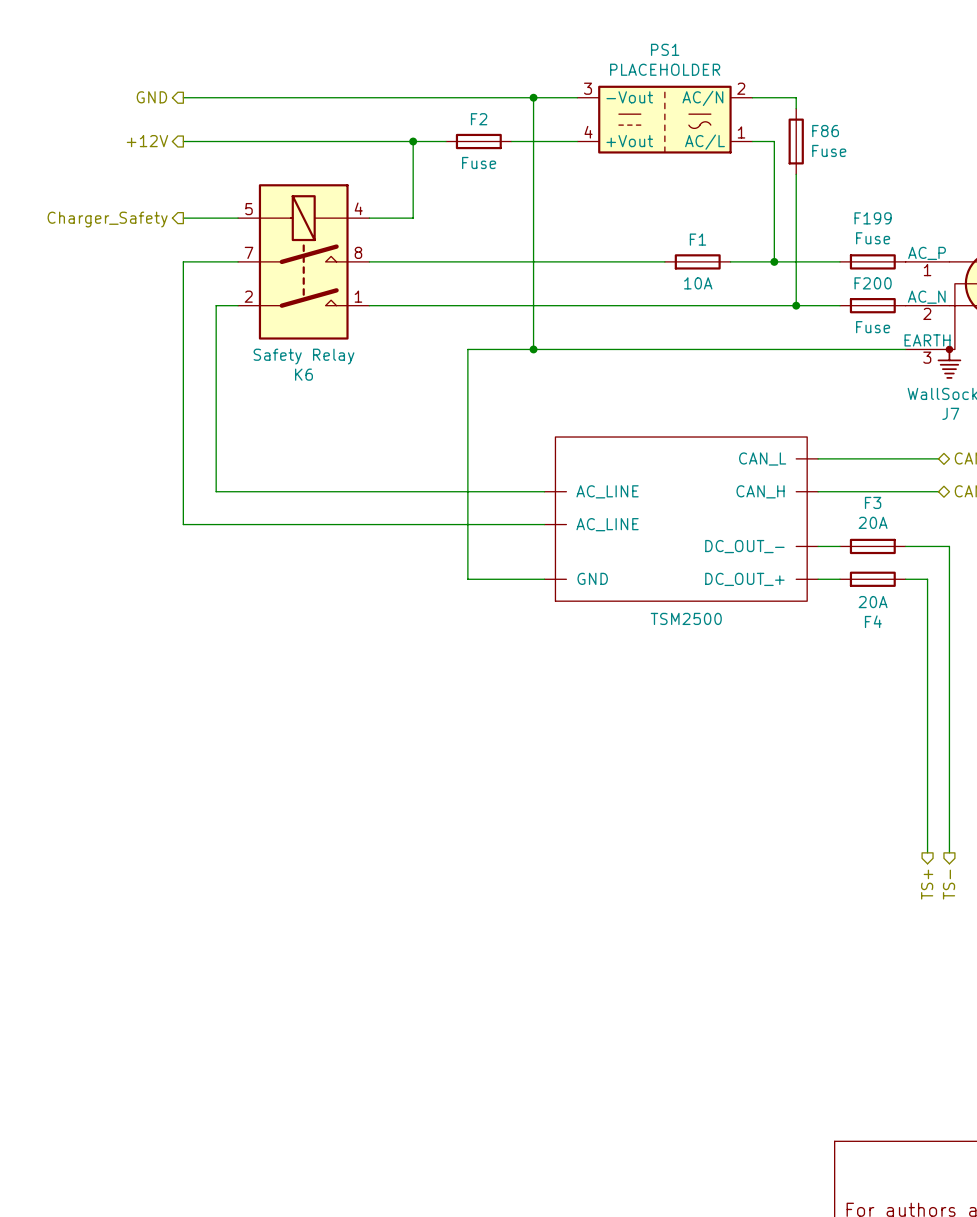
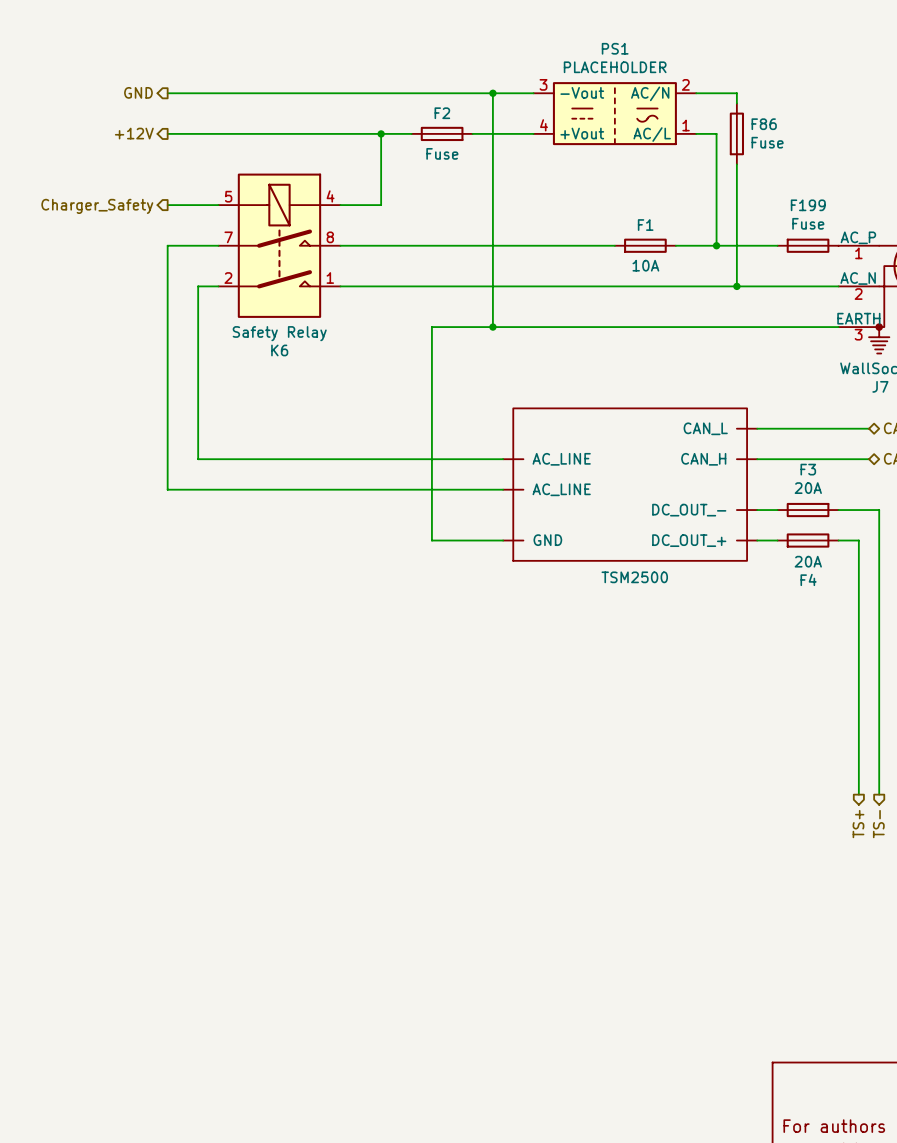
F200: Fuse (872, 305) -> none

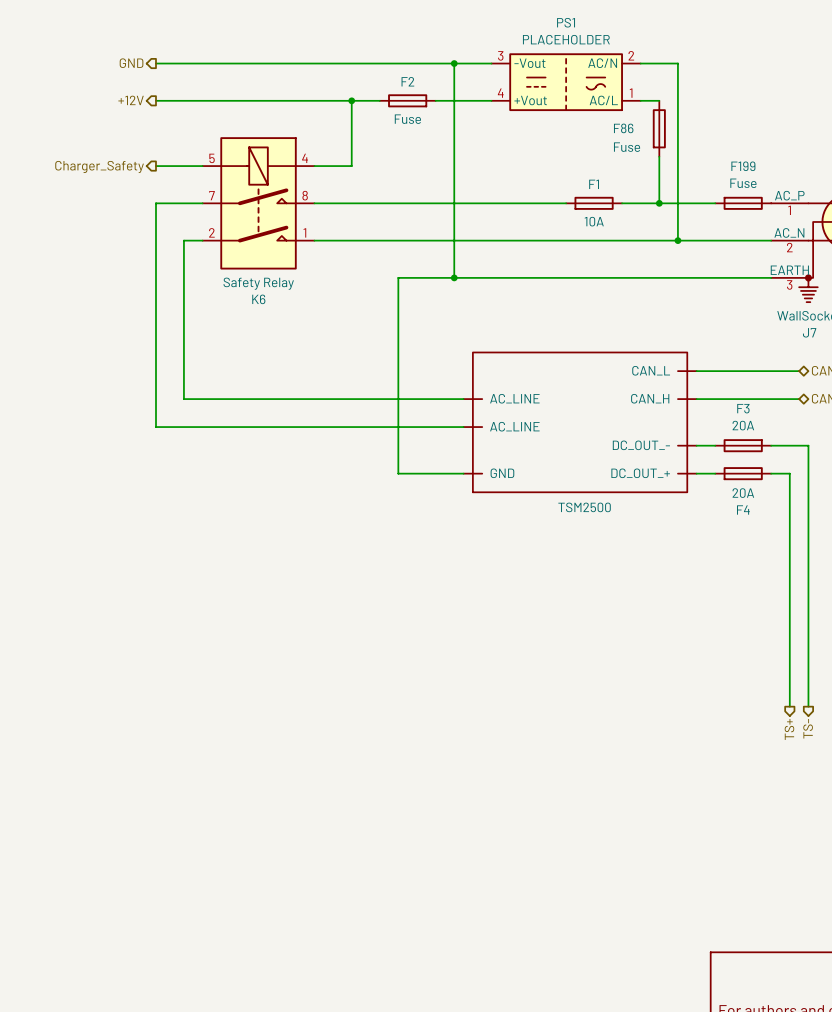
F86 name position: F86 (764, 124) -> F86 (623, 128)
F86 position: (736, 133) -> (659, 128)
F86 value position: Fuse (767, 142) -> Fuse (627, 147)

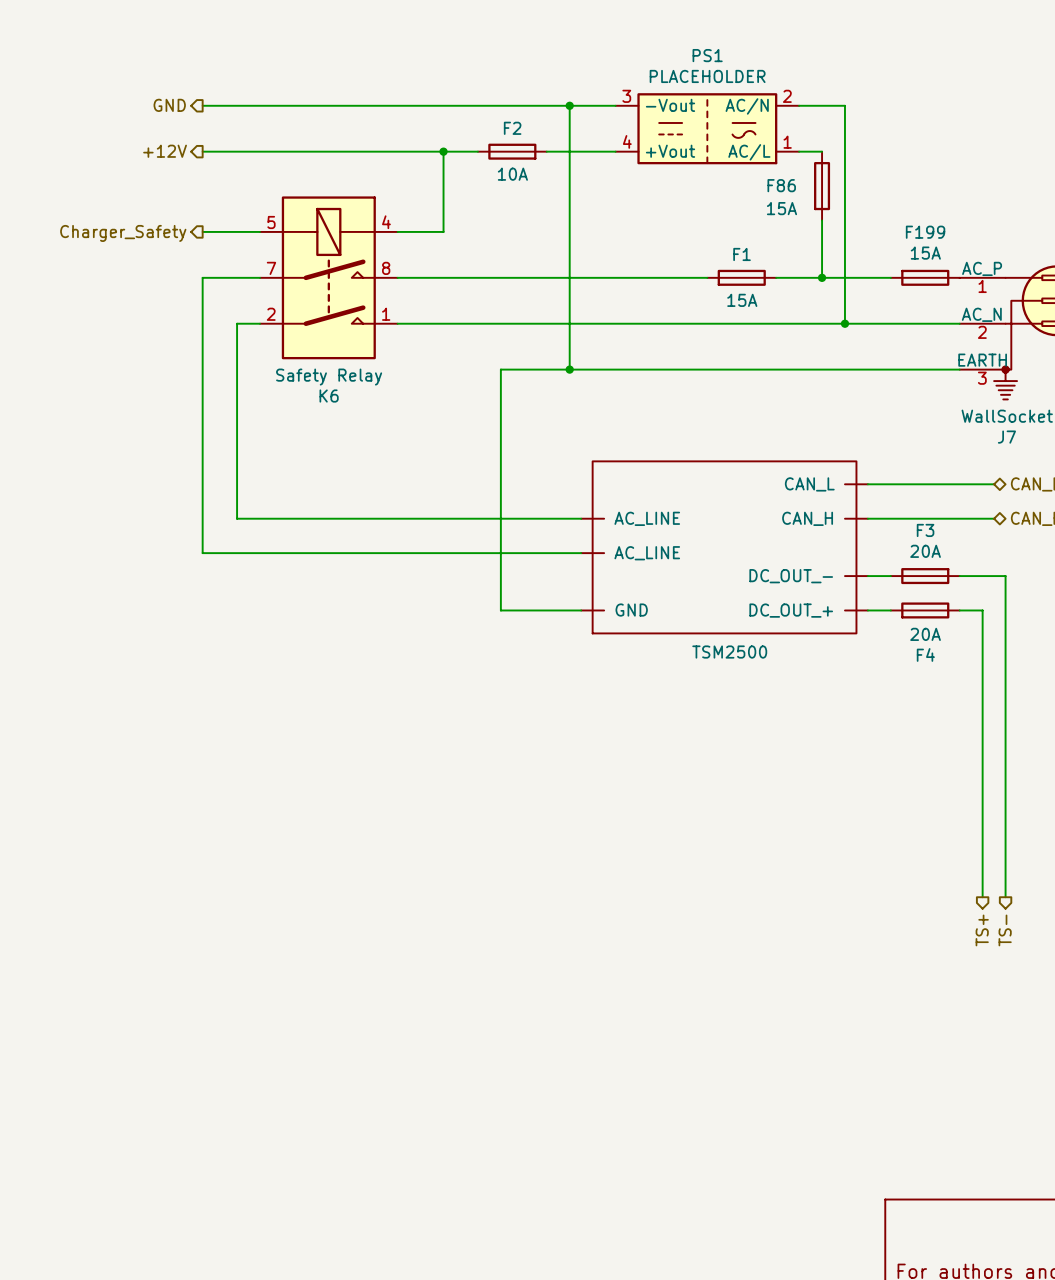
F2 value: Fuse (407, 119) -> 10A (512, 174)
F86 value: Fuse (627, 147) -> 15A (781, 208)
F199 value: Fuse (743, 183) -> 15A (925, 253)
F1 value: 10A (594, 221) -> 15A (742, 300)

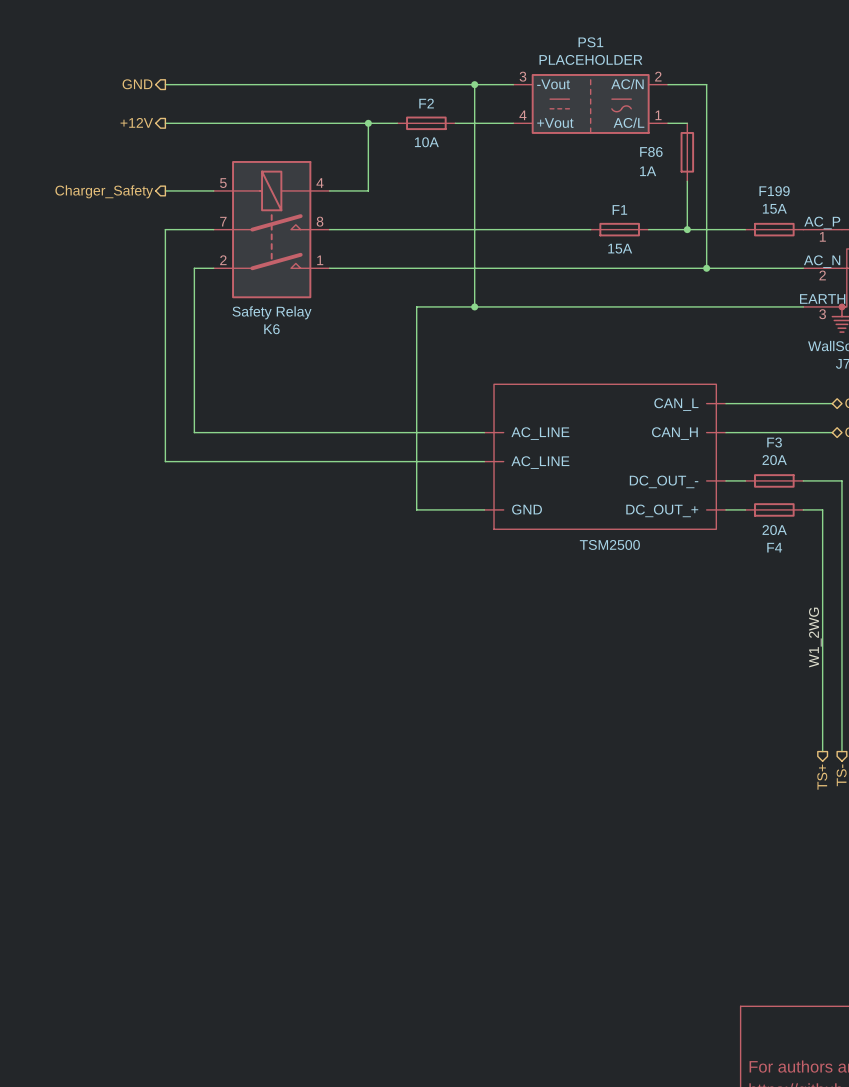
F86 value: 15A (781, 208) -> 1A (648, 171)
label: none -> W1_2WG (815, 637)

